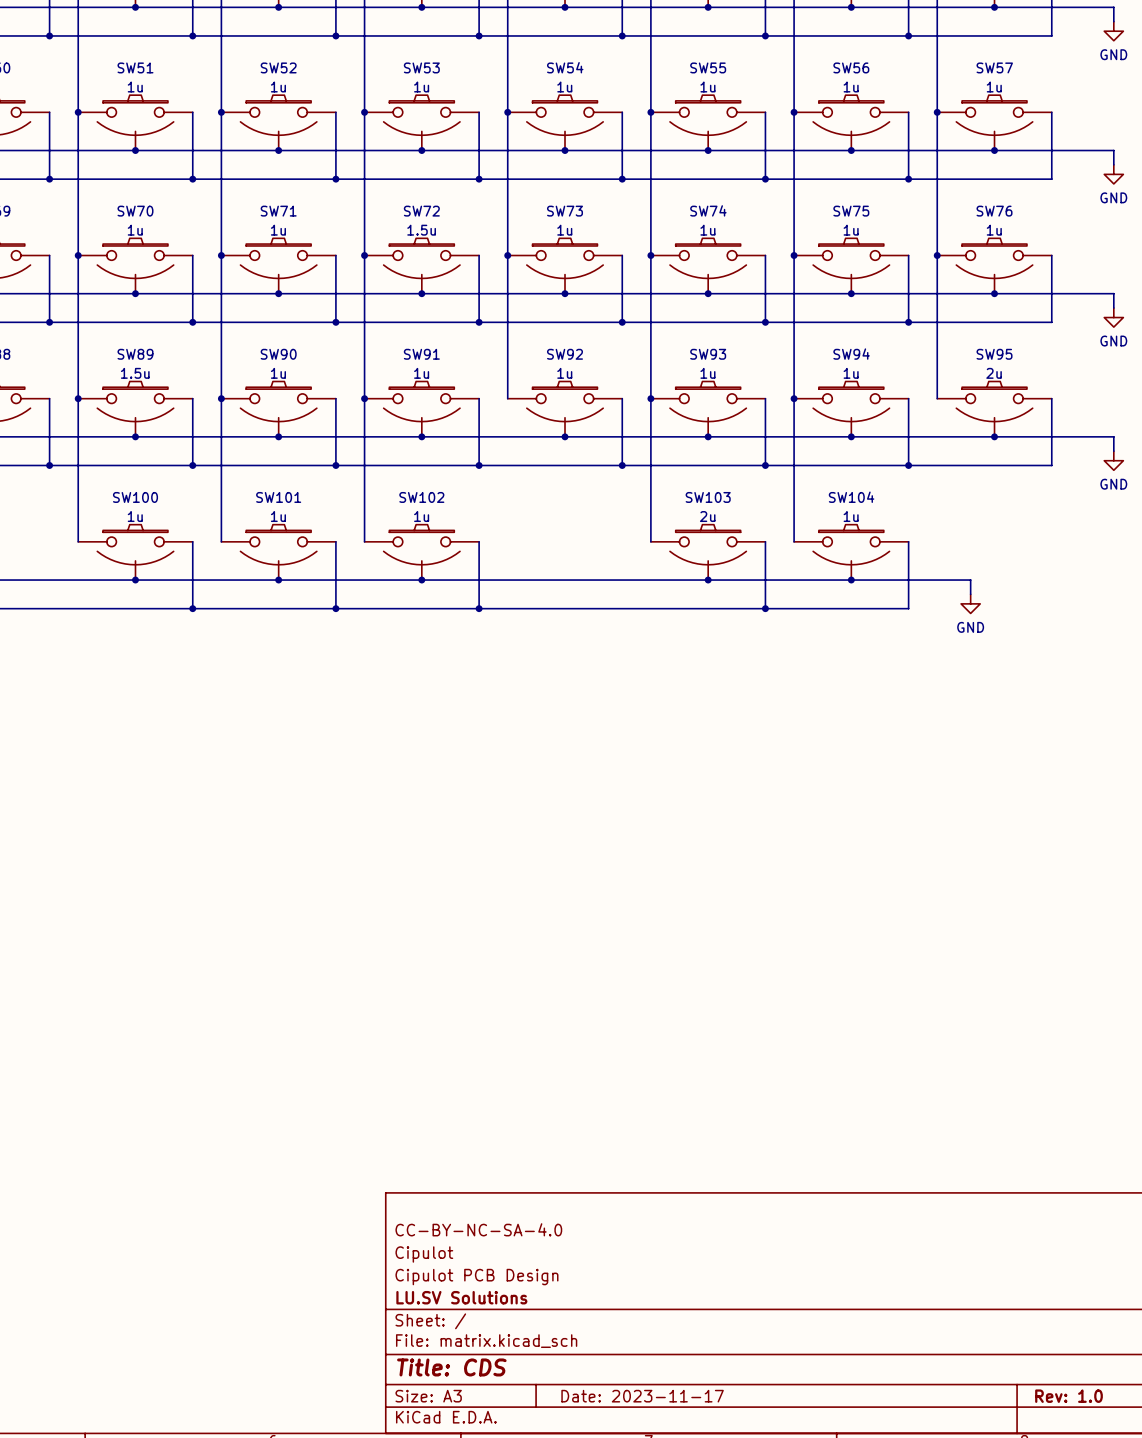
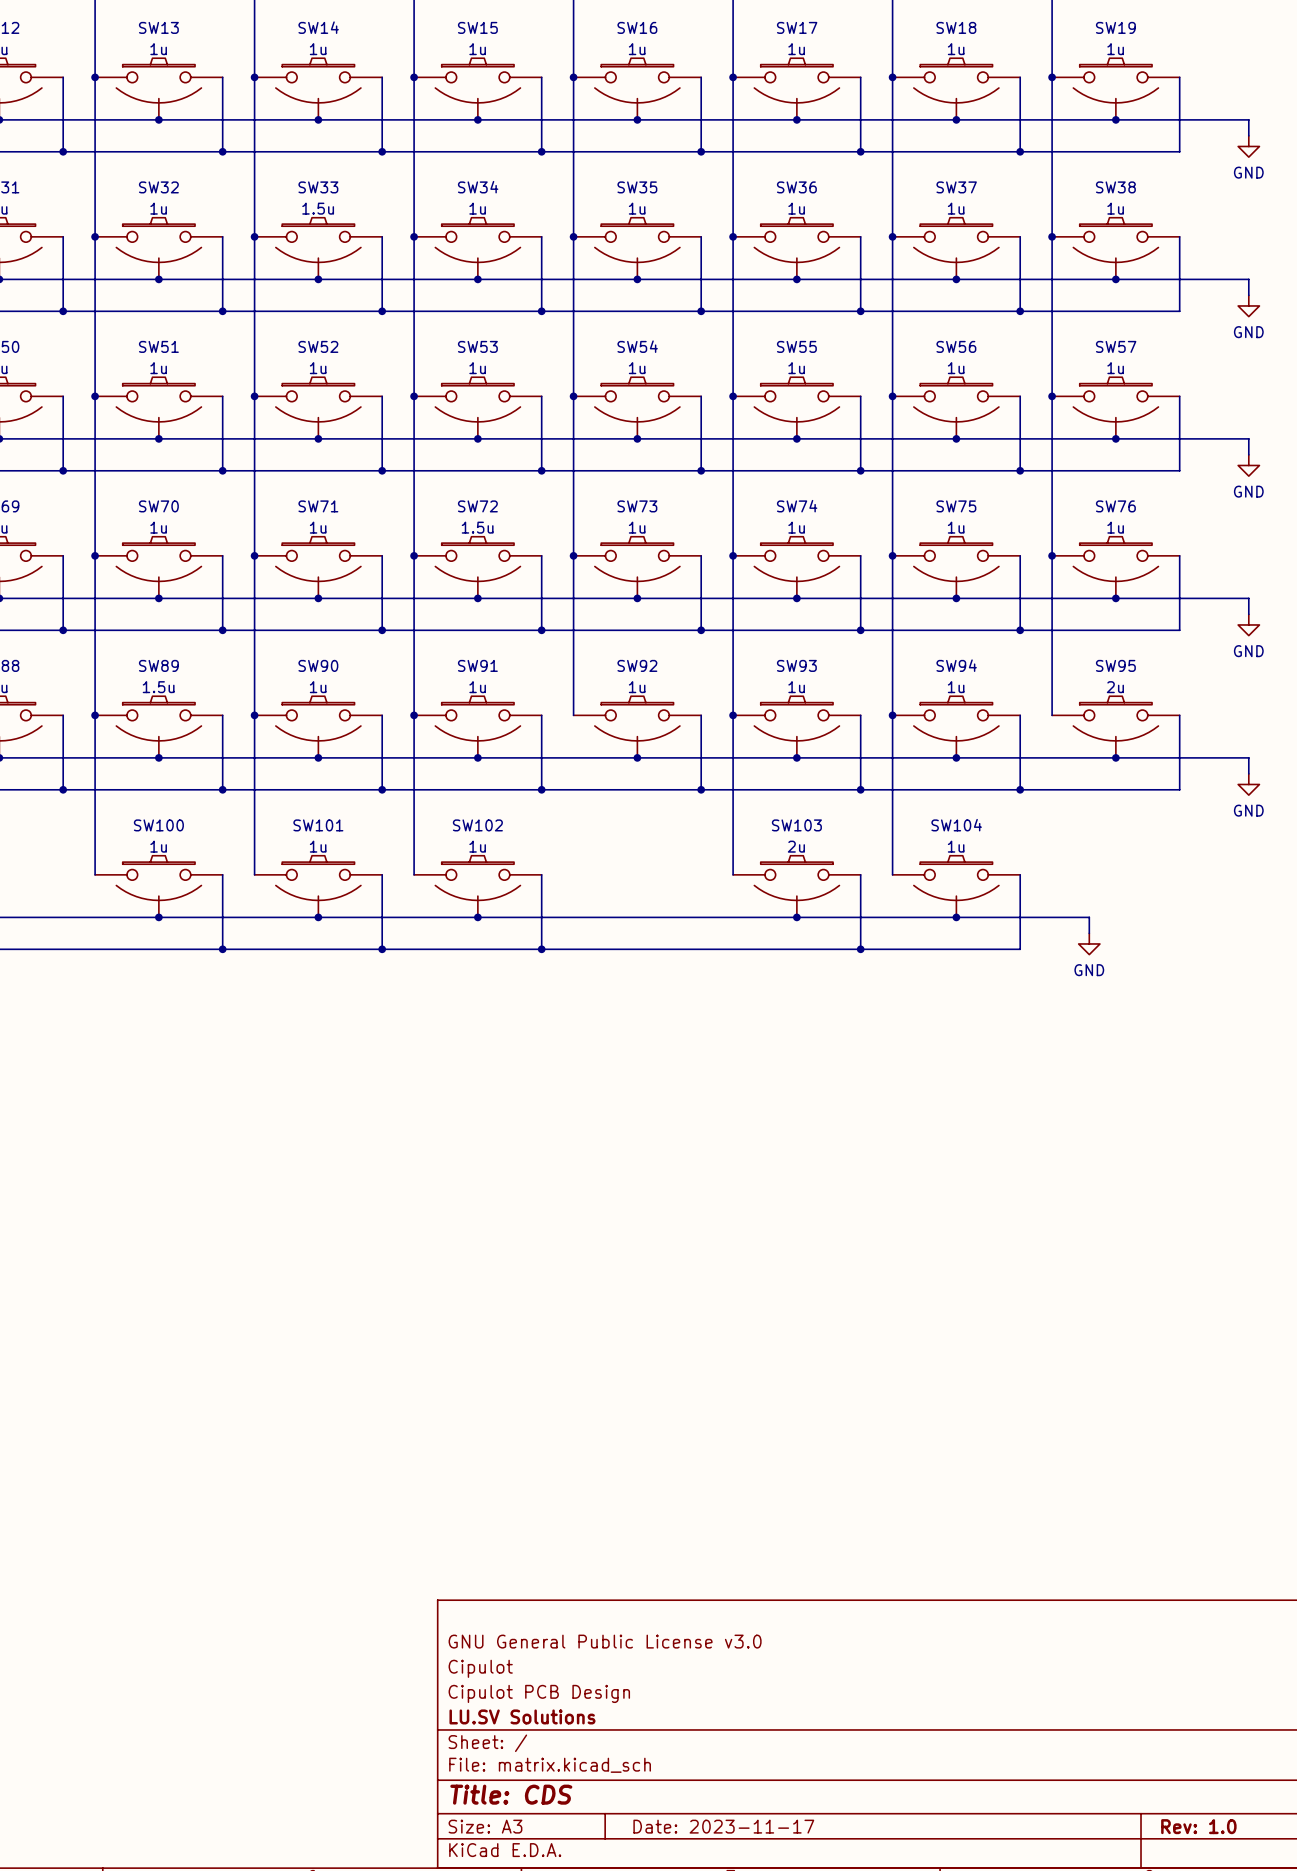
title block: CC-BY-NC-SA-4.0 (478, 1229) -> GNU General Public License v3.0 (605, 1641)

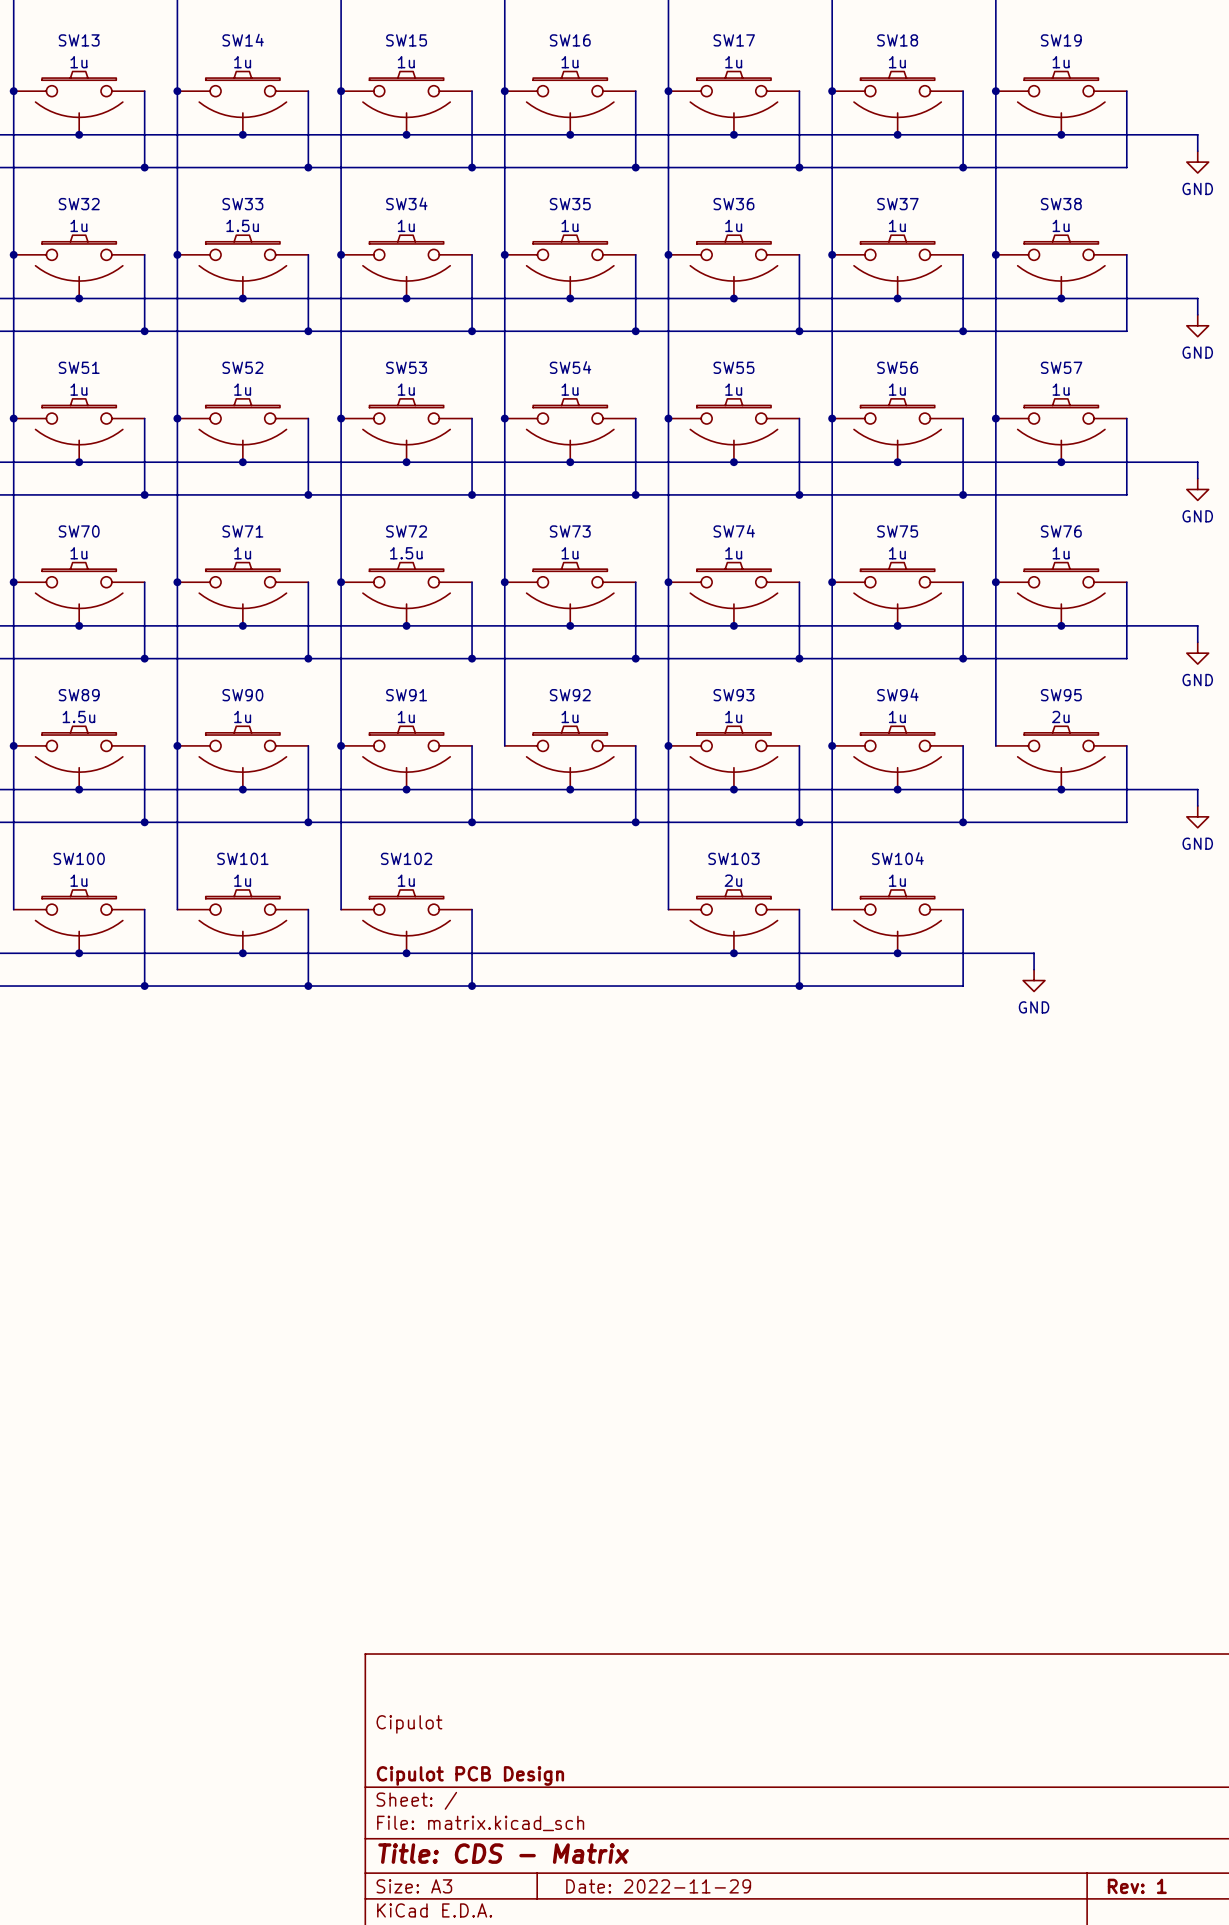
title block: GNU General Public License v3.0 (605, 1641) -> none
title block: Cipulot PCB Design (539, 1693) -> none
title block: LU.SV Solutions (522, 1716) -> Cipulot PCB Design (470, 1775)
title block: Title: CDS (511, 1794) -> Title: CDS - Matrix (503, 1853)
title block: Date: 2023-11-17 (723, 1826) -> Date: 2022-11-29 (658, 1886)
title block: Rev: 1.0 (1198, 1826) -> Rev: 1 (1137, 1886)

